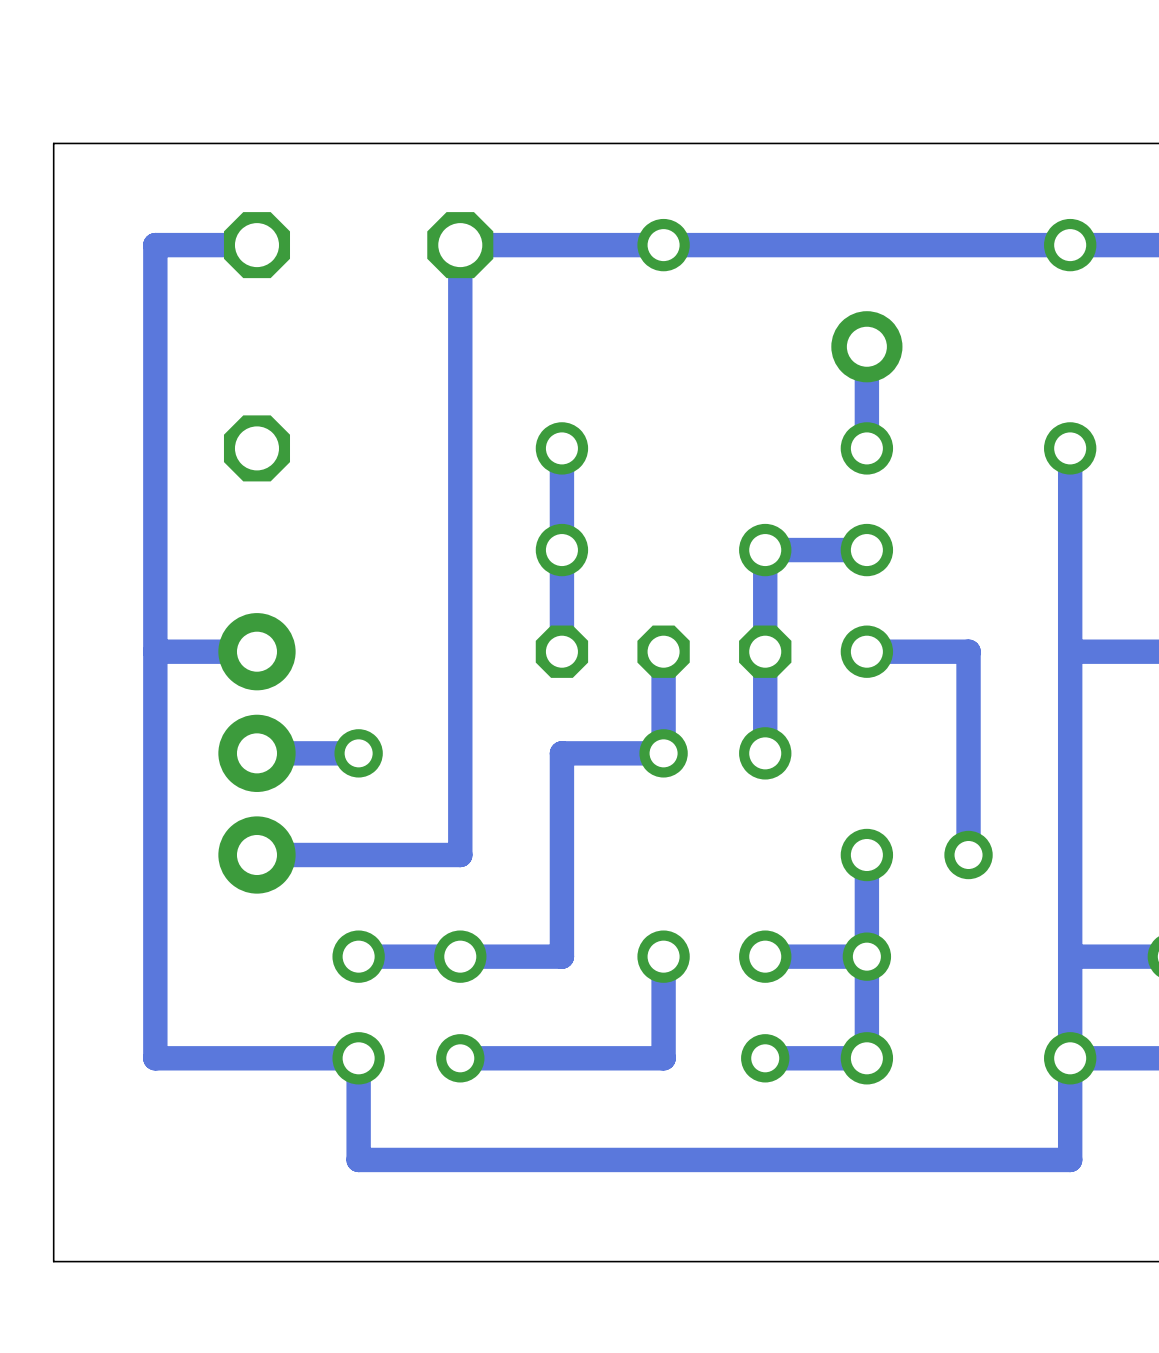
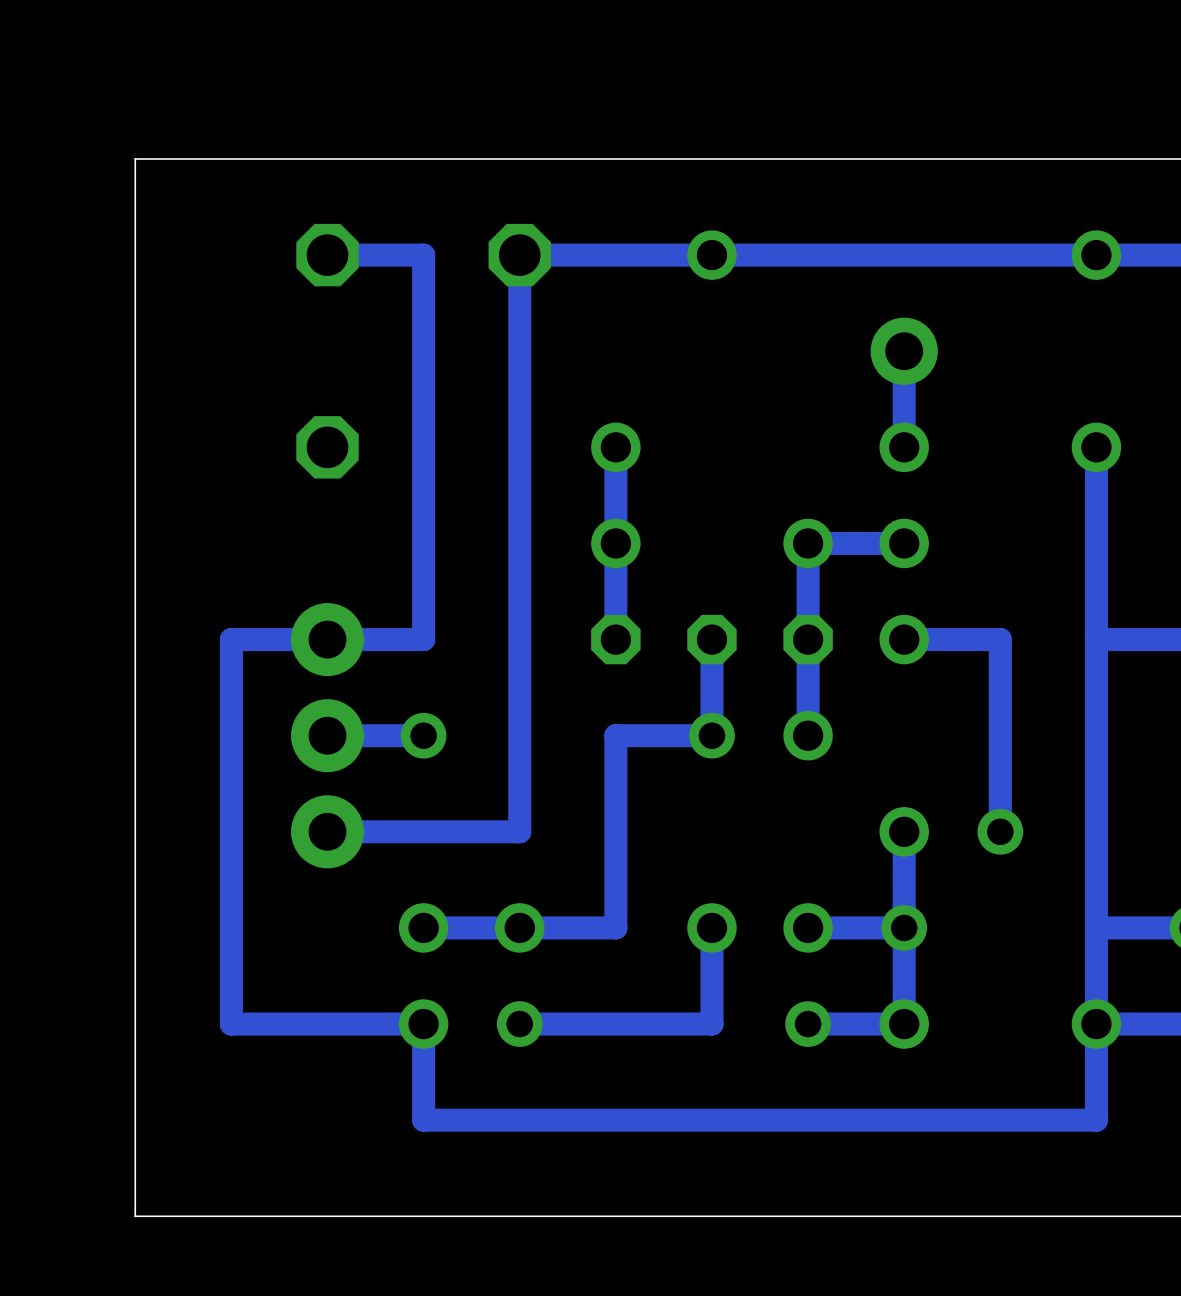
track: (256, 245) (155, 245) (155, 651) -> (327, 255) (423, 255) (423, 639) (327, 639)

